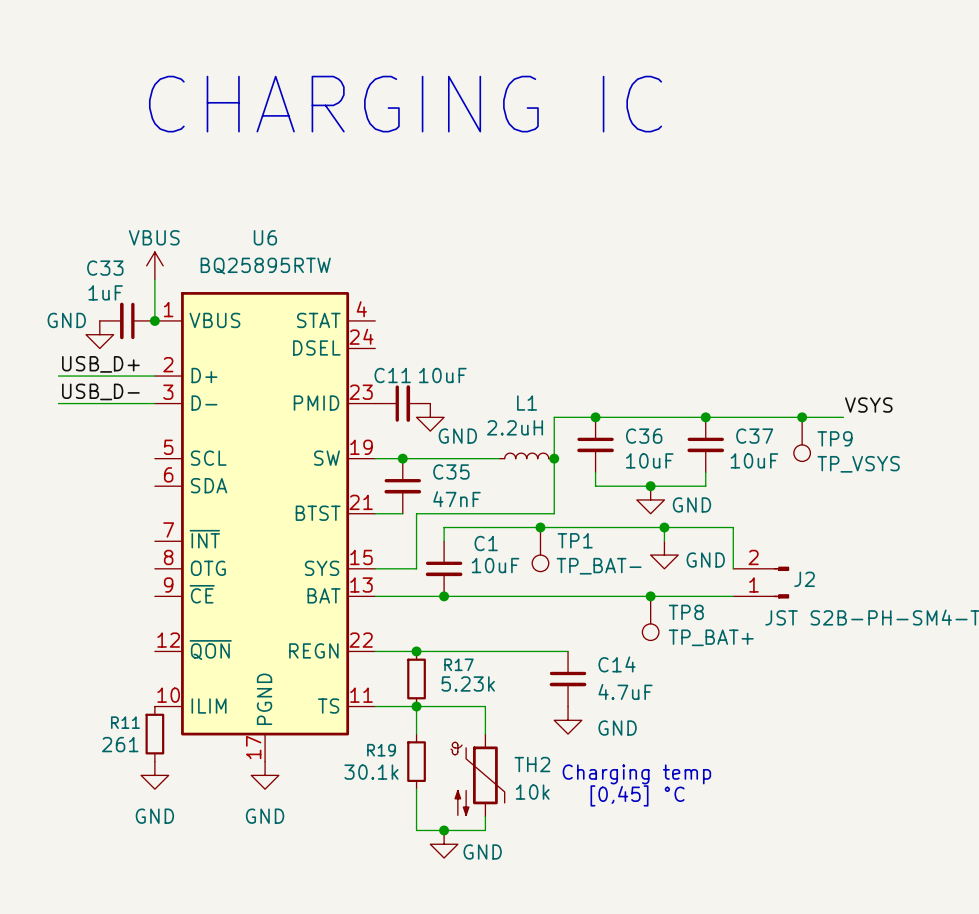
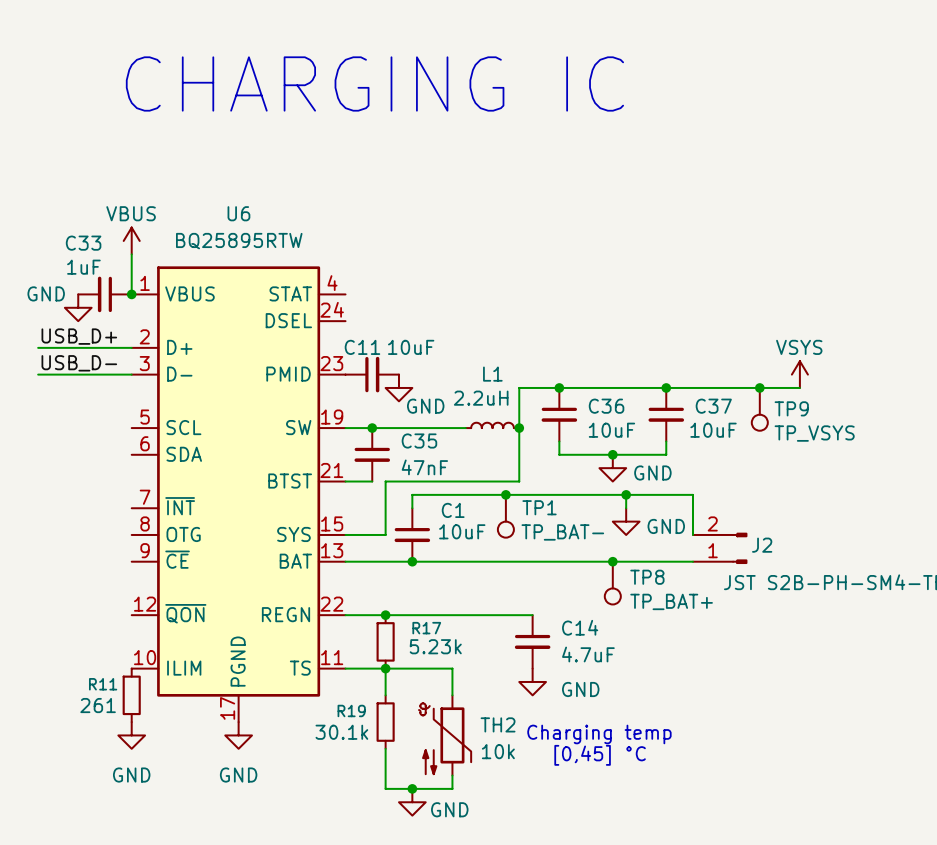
power symbol: none -> VSYS (799, 374)
label: VSYS (868, 405) -> none

